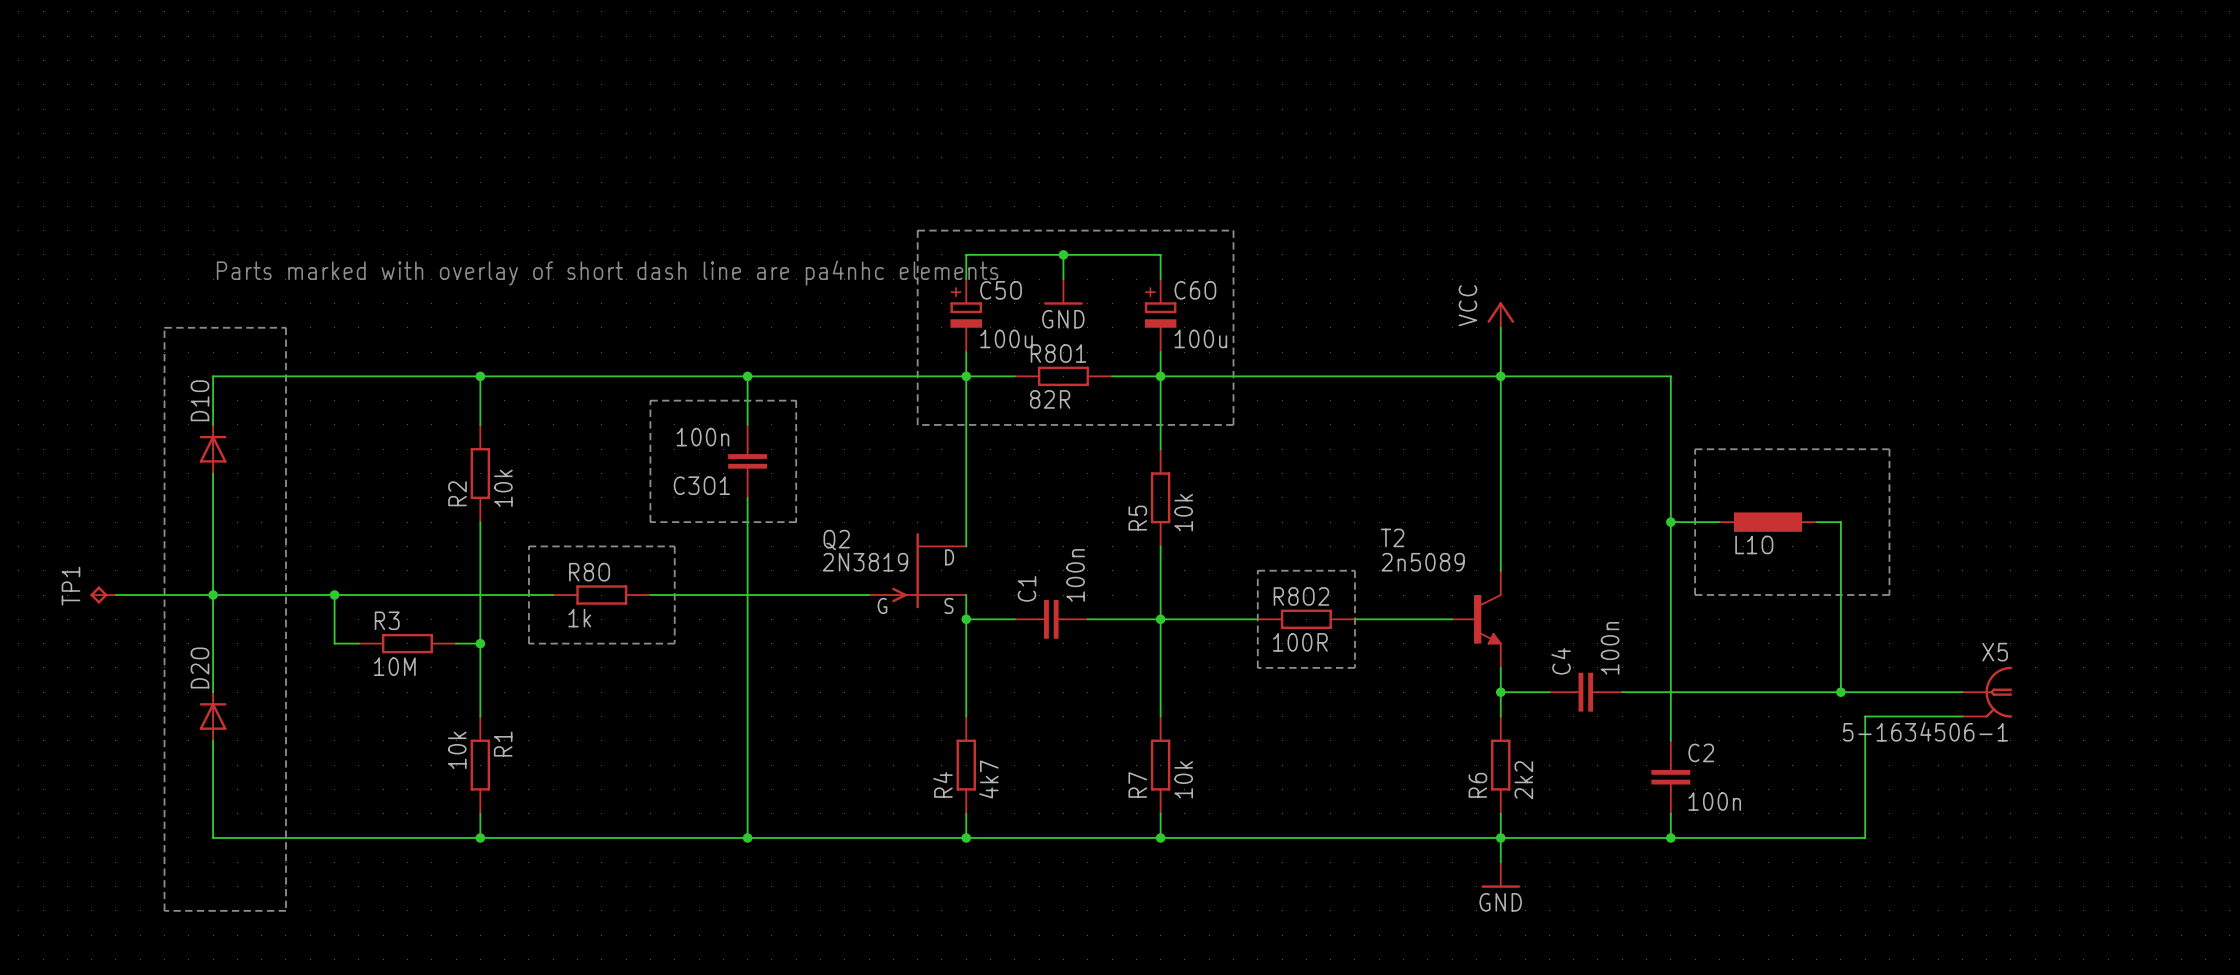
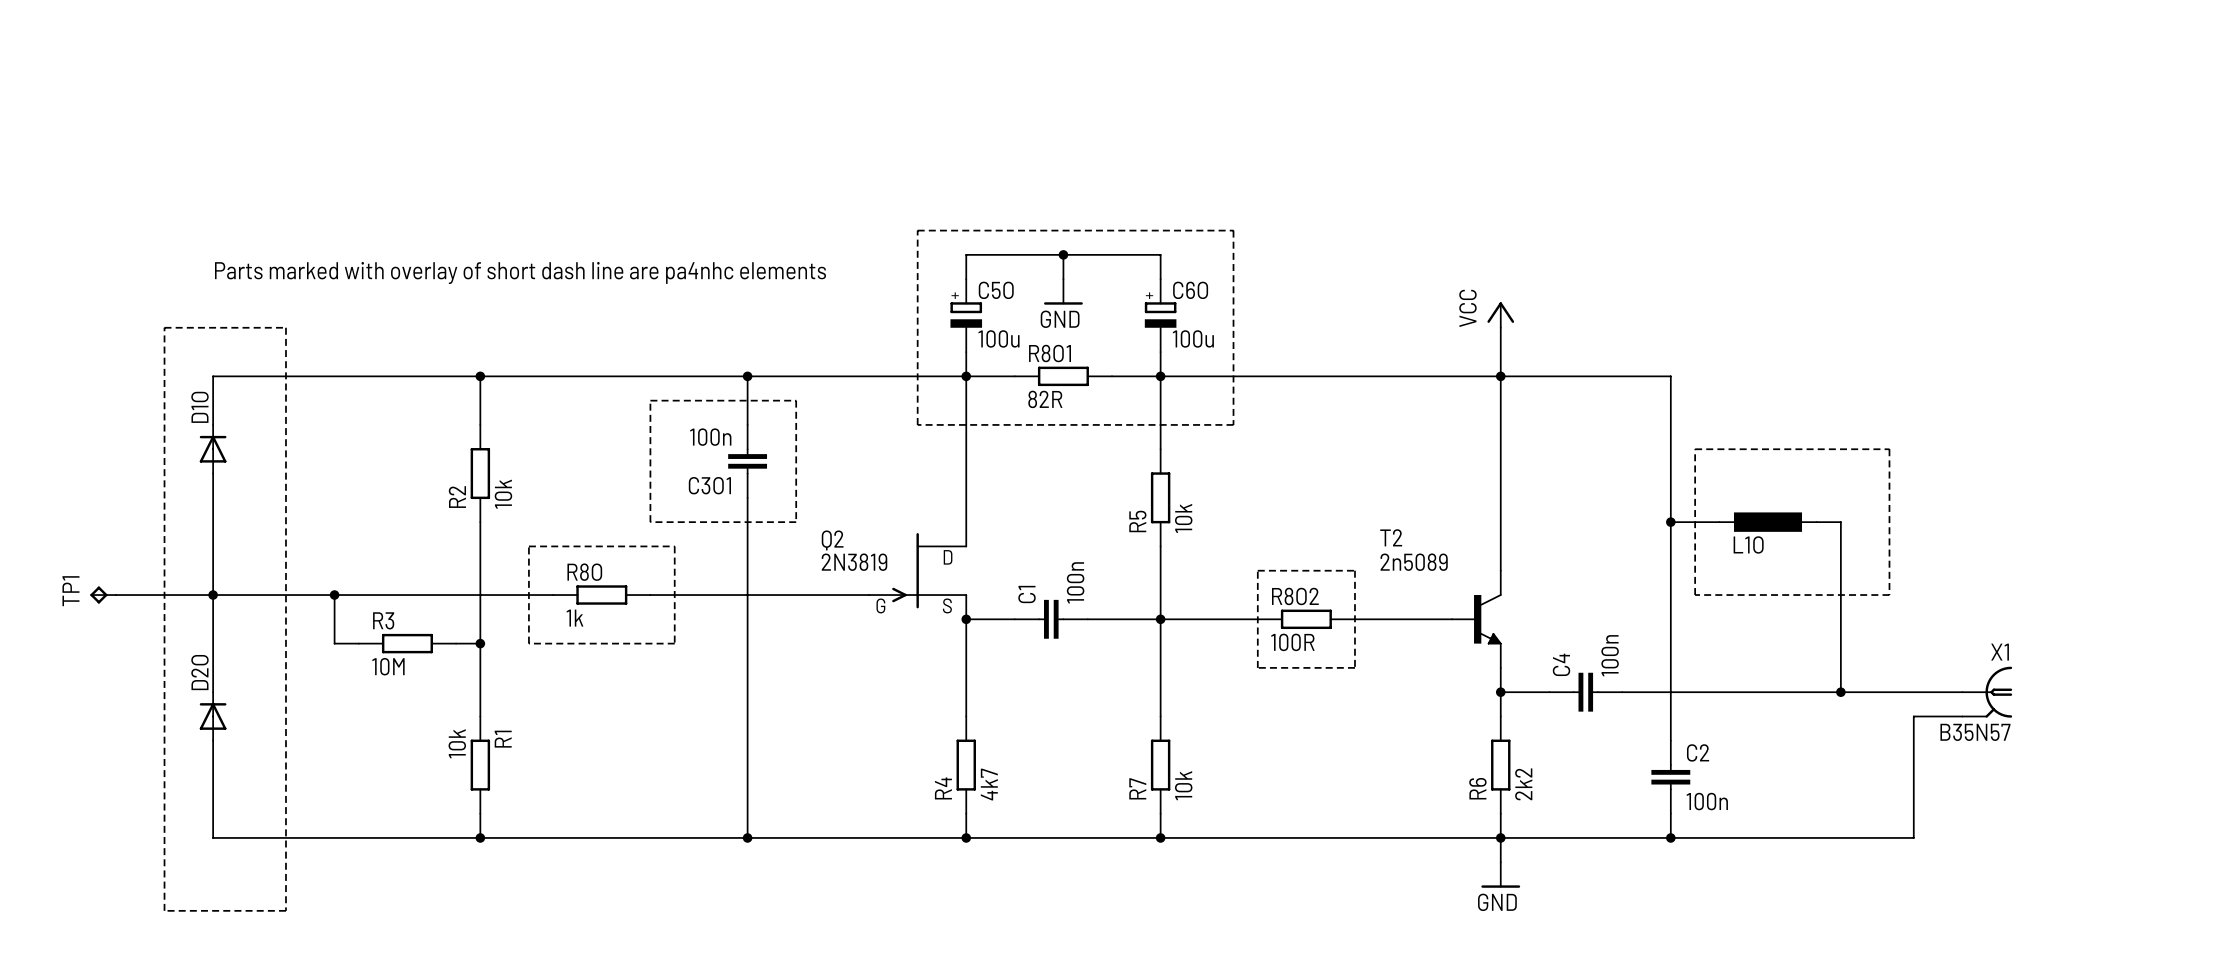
X5 name: X5 (1995, 652) -> X1 (2000, 652)
wire: (1913, 716) (1865, 716) (1865, 837) -> (1913, 716) (1913, 837) (1865, 837)
X5 value: 5-1634506-1 (1925, 731) -> B35N57 (1975, 732)

